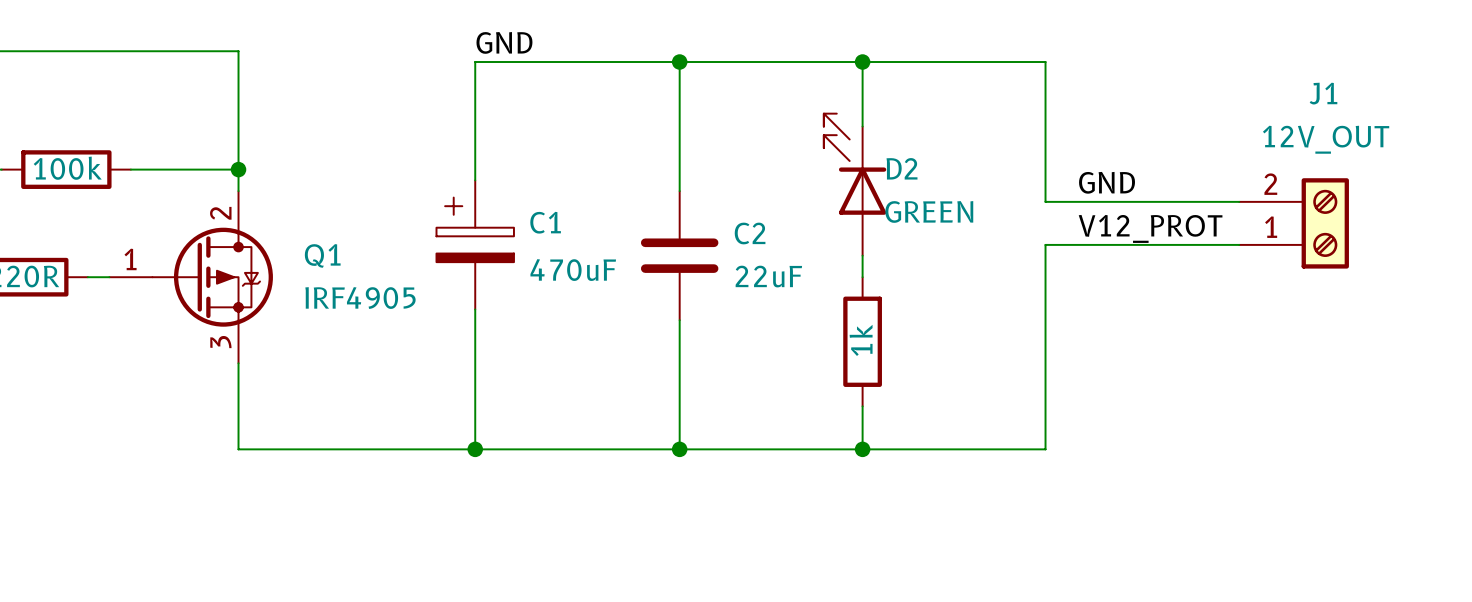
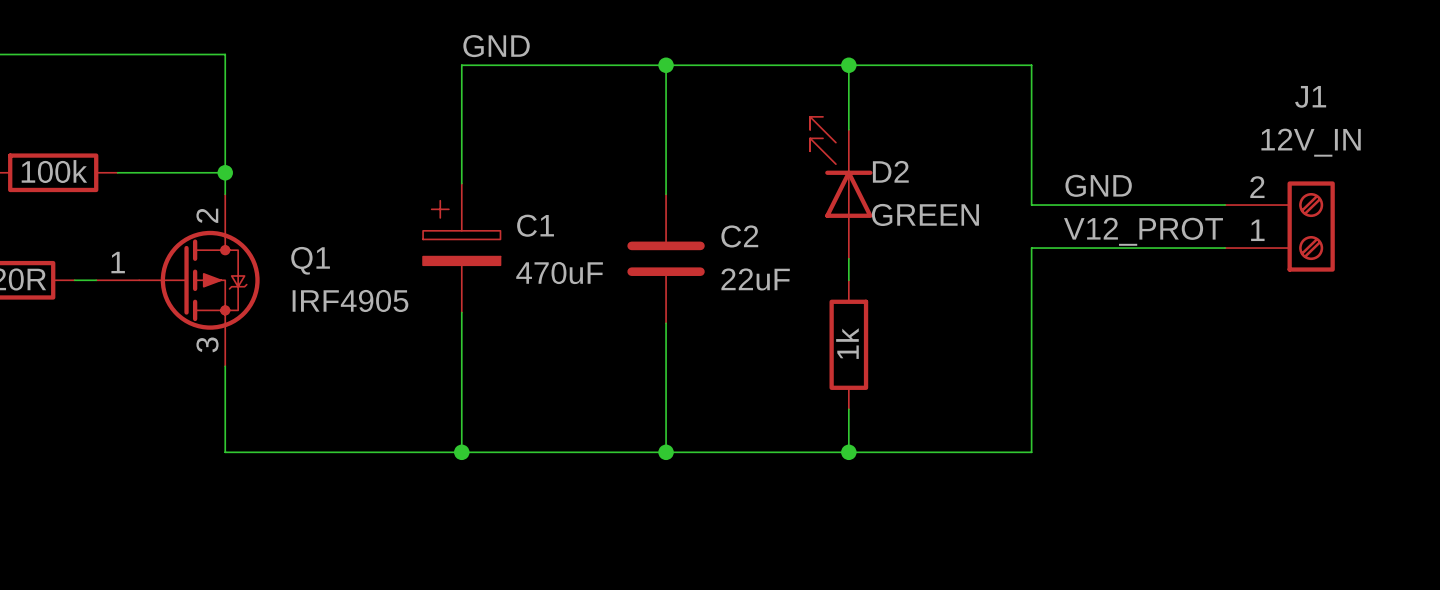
J1 value: 12V_OUT (1326, 139) -> 12V_IN (1311, 142)

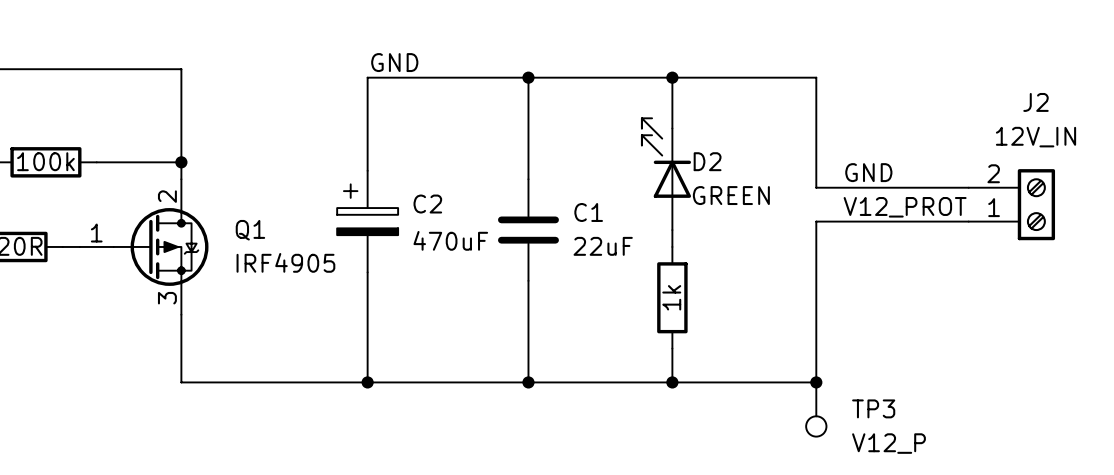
J1 name: J1 (1310, 96) -> J2 (1036, 102)
C1 name: C1 (535, 225) -> C2 (427, 204)
C2 name: C2 (739, 236) -> C1 (588, 212)
junction: none -> (816, 382)
TP3: none -> V12_P (816, 409)

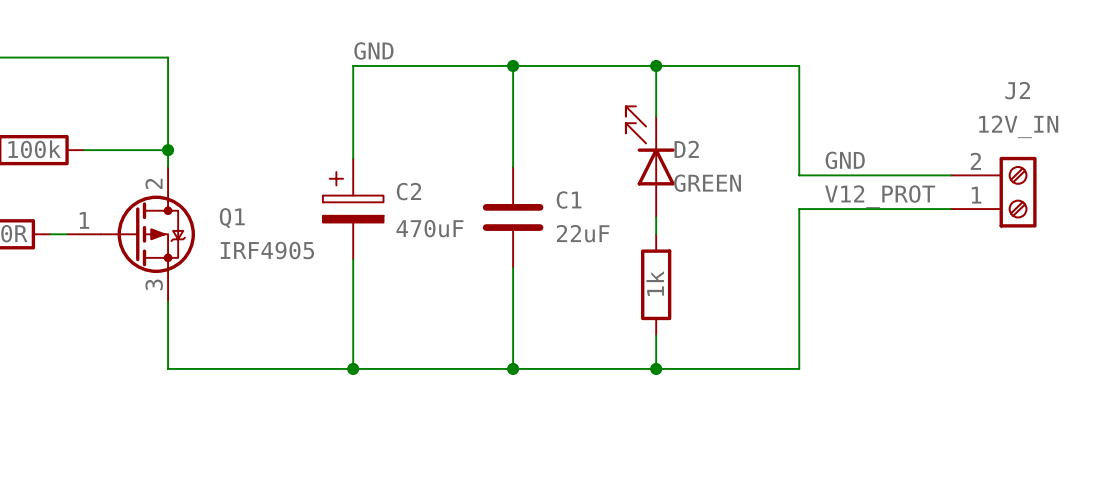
junction: (816, 382) -> none
TP3: V12_P (816, 409) -> none

